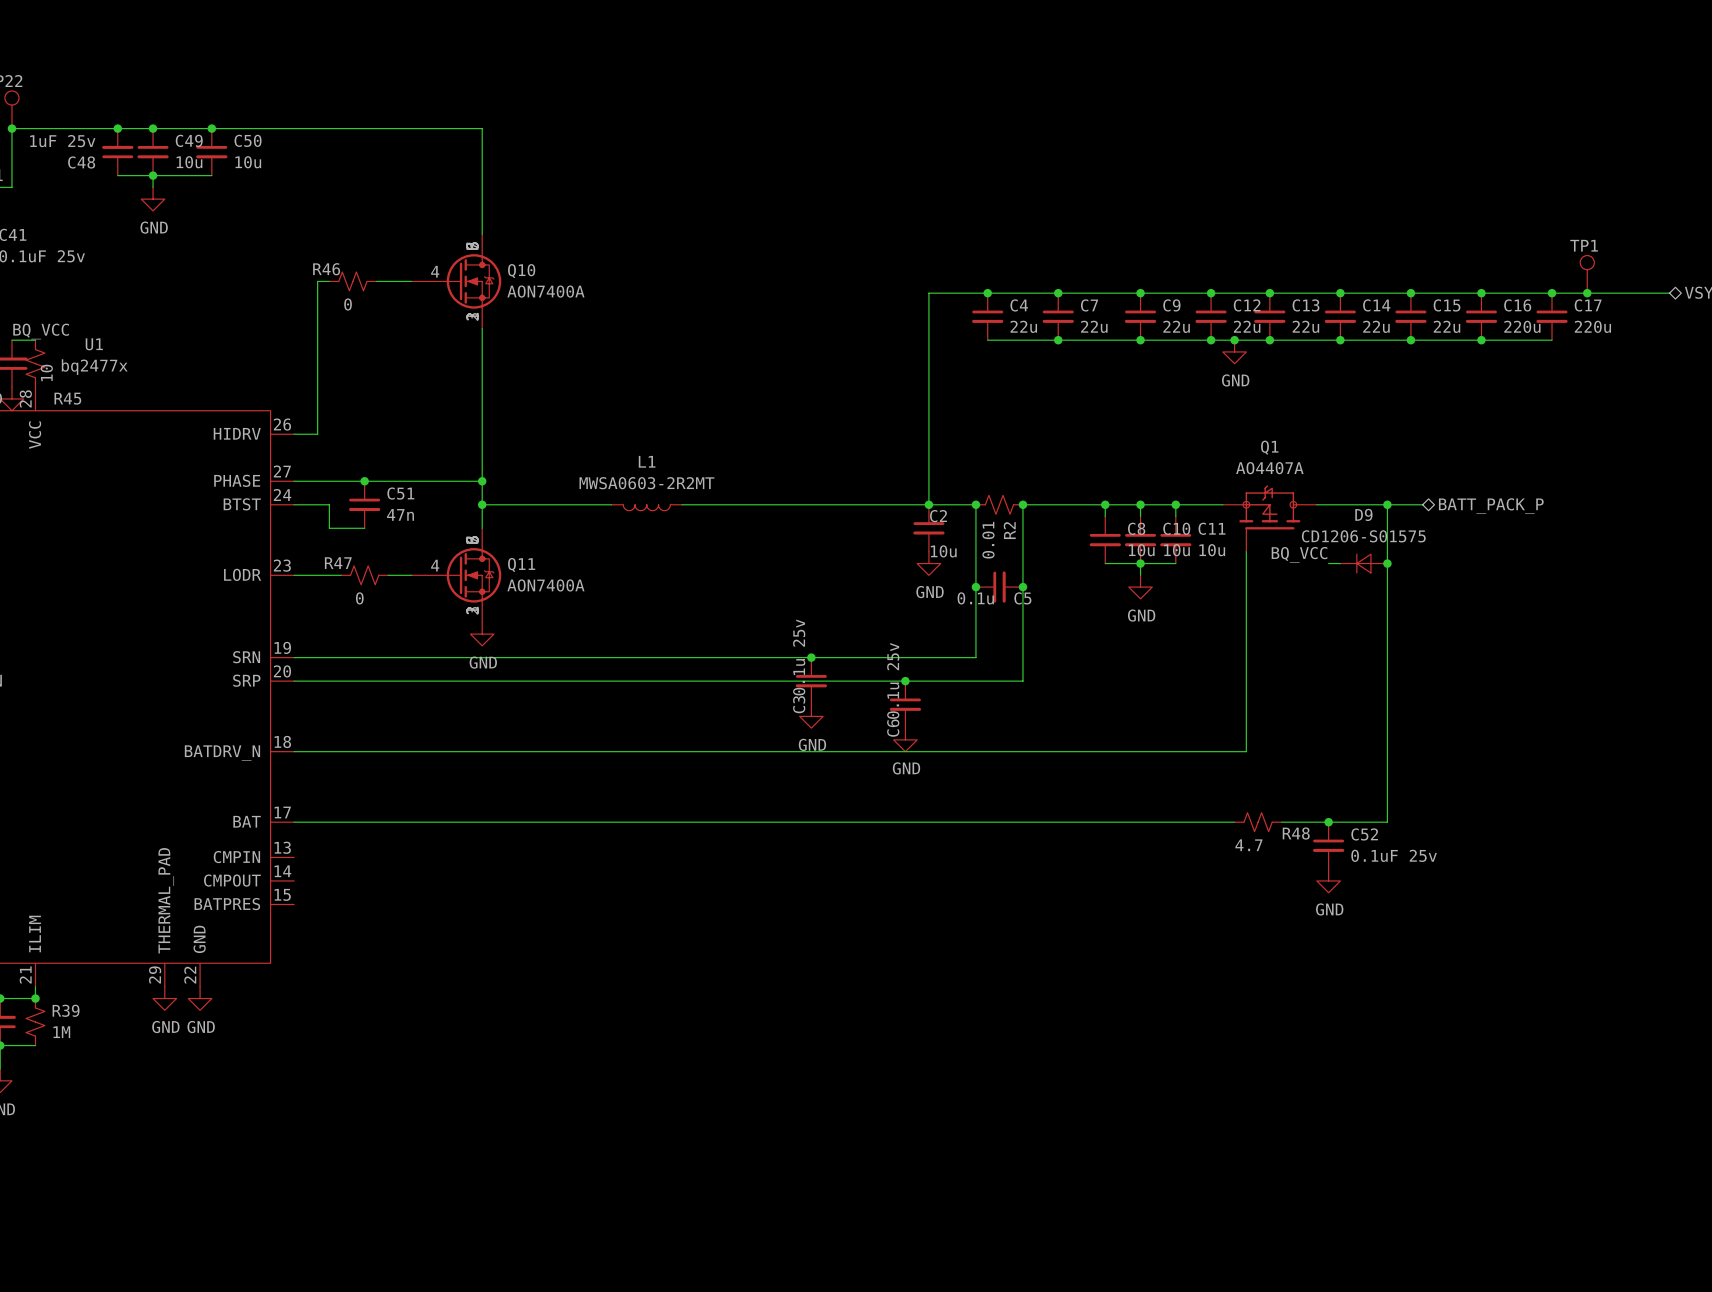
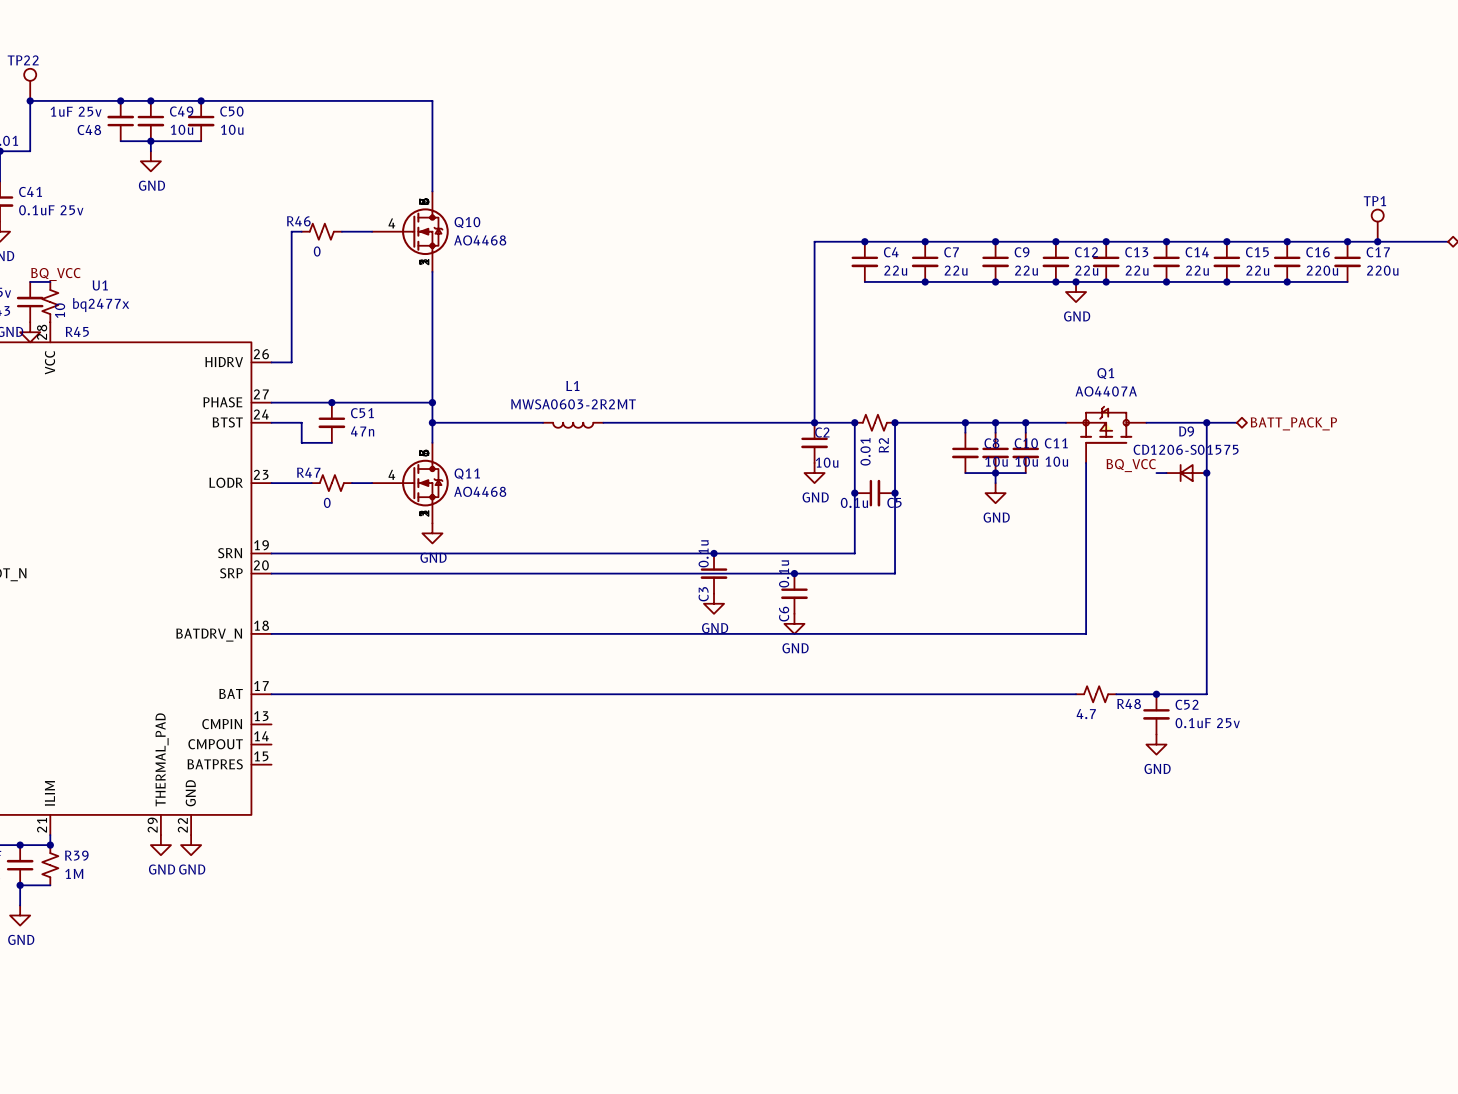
Q10 value: AON7400A (545, 291) -> AO4468 (480, 240)
Q11 value: AON7400A (545, 585) -> AO4468 (480, 491)
C3 value: 0.1u 25v (799, 657) -> 0.1u (703, 553)
C6 value: 0.1u 25v (893, 680) -> 0.1u (784, 573)

